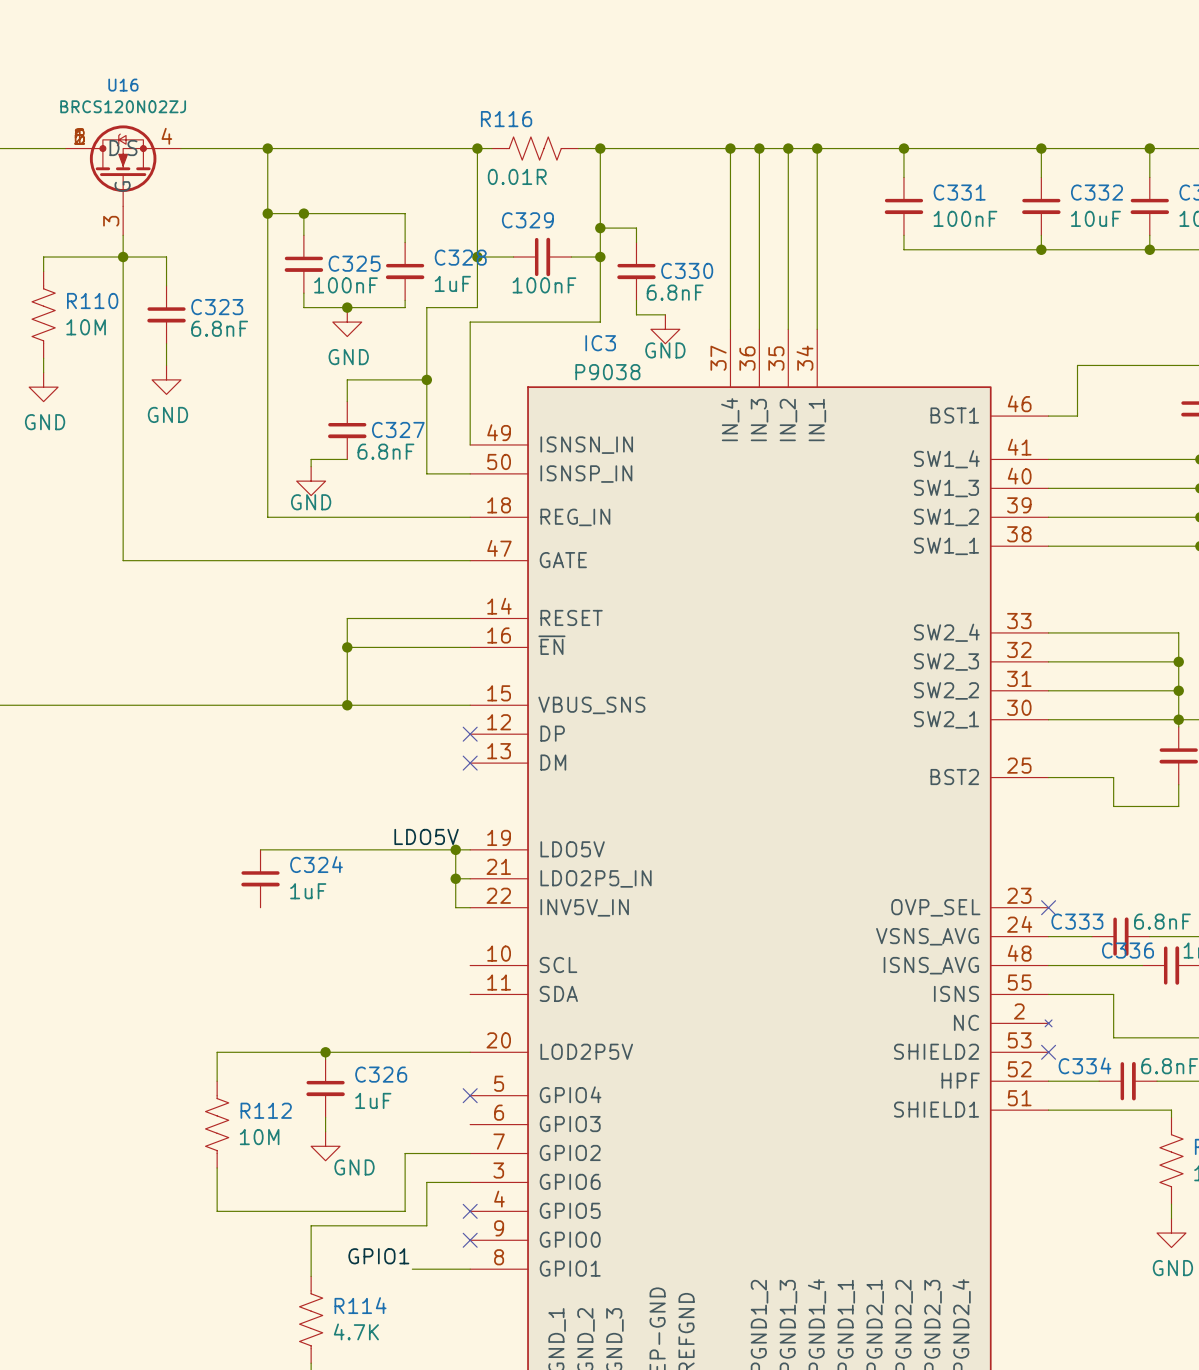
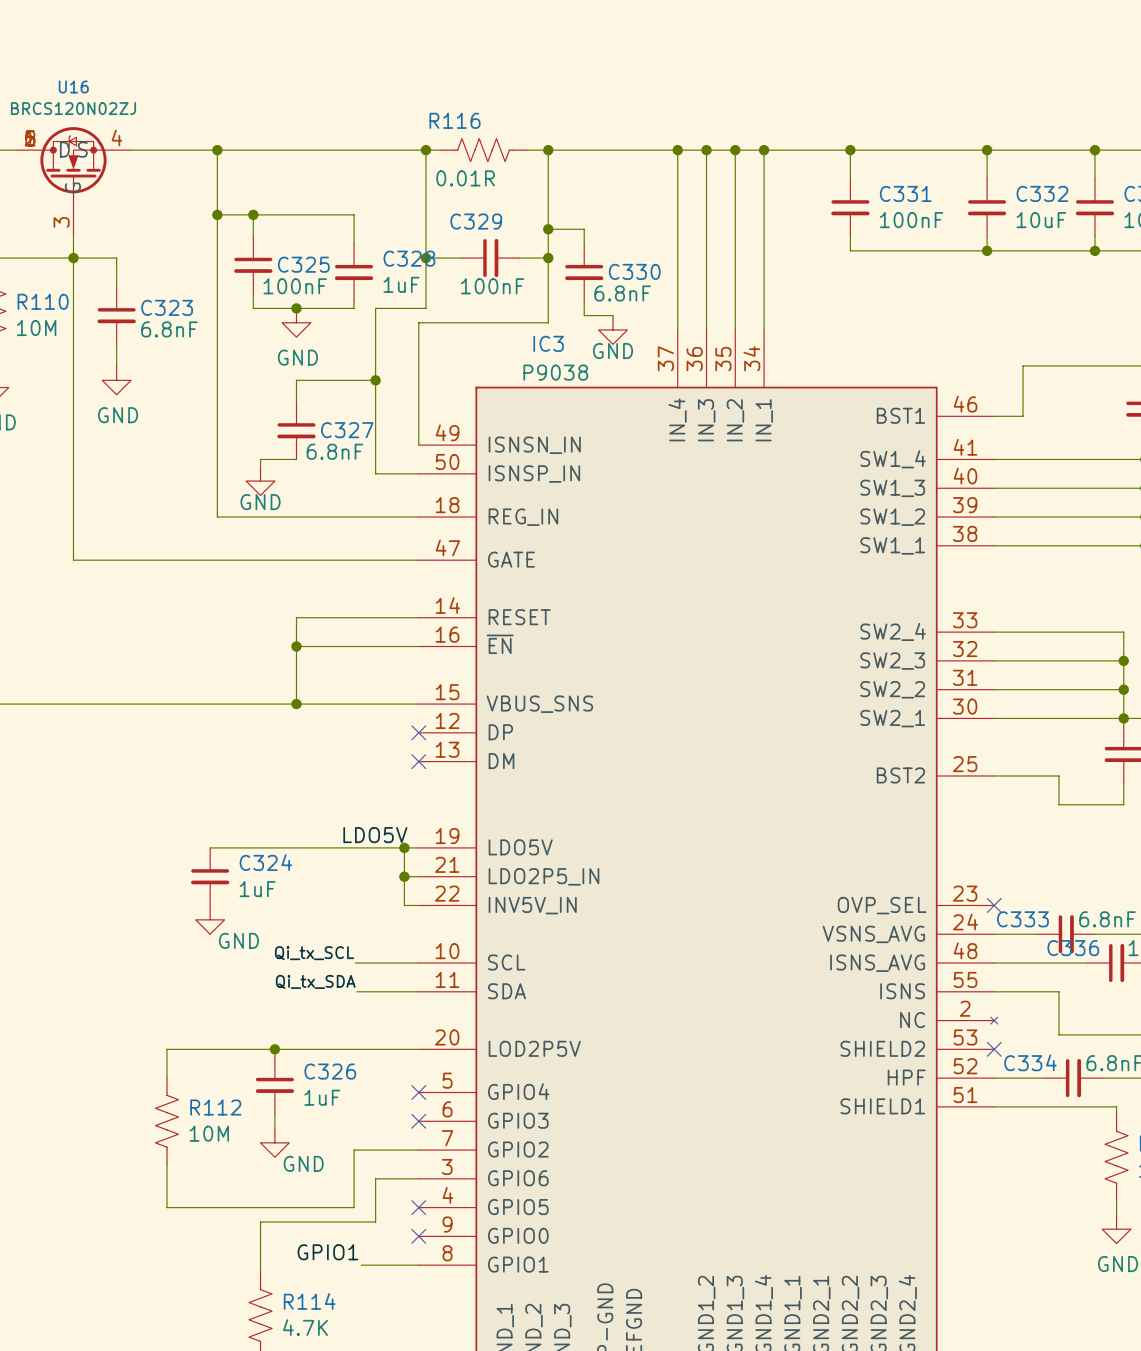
power symbol: none -> GND (210, 919)
label: none -> Qi_tx_SCL (314, 953)
wire: none -> (355, 963) (418, 963)
label: none -> Qi_tx_SDA (315, 981)
wire: none -> (356, 991) (418, 991)
no-connect mark: none -> (418, 1121)

